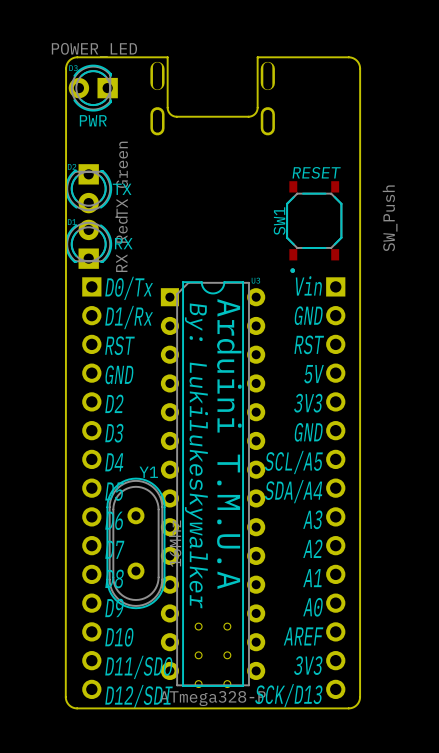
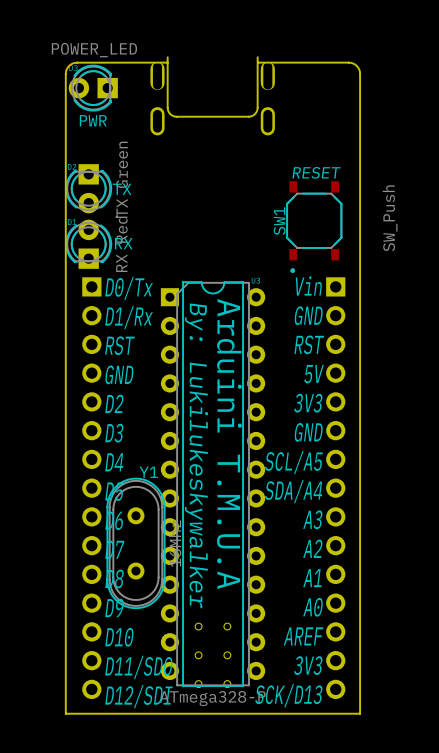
board edge: (167, 57) (76, 57) (69, 60) (66, 67) (66, 699) (70, 705) (77, 708) (350, 708) (357, 704) (360, 697) (360, 67) (356, 60) (350, 57) (257, 57) -> none
board edge: none -> (167, 62) (75, 62) (69, 66) (65, 72) (65, 713) (360, 713) (360, 74)
board edge: none -> (257, 62) (350, 62) (357, 67) (360, 74)

